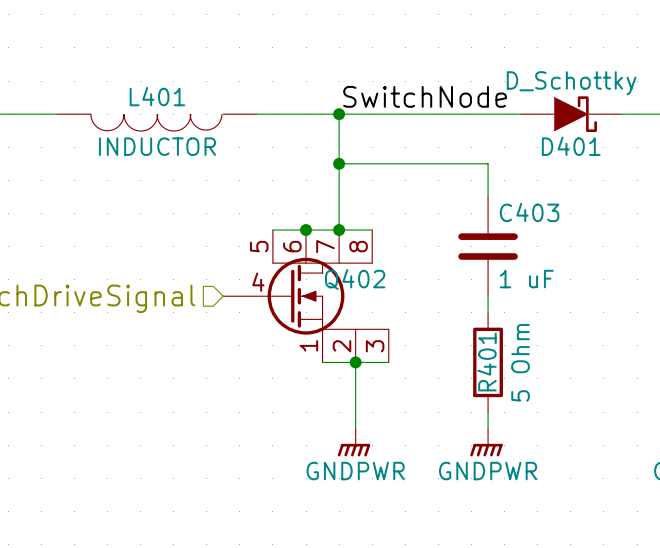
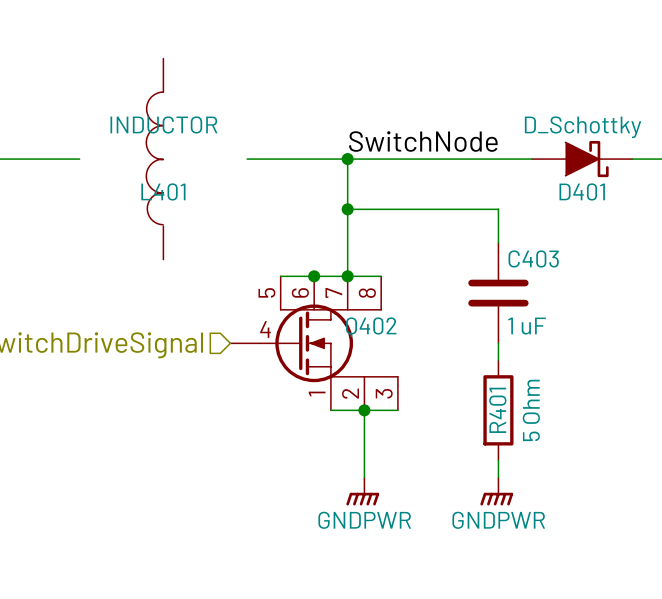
L401 name position: L401 (157, 96) -> L401 (163, 191)
L401 rotation: 0° (156, 122) -> 90° clockwise (154, 158)
L401 value position: INDUCTOR (157, 146) -> INDUCTOR (163, 124)

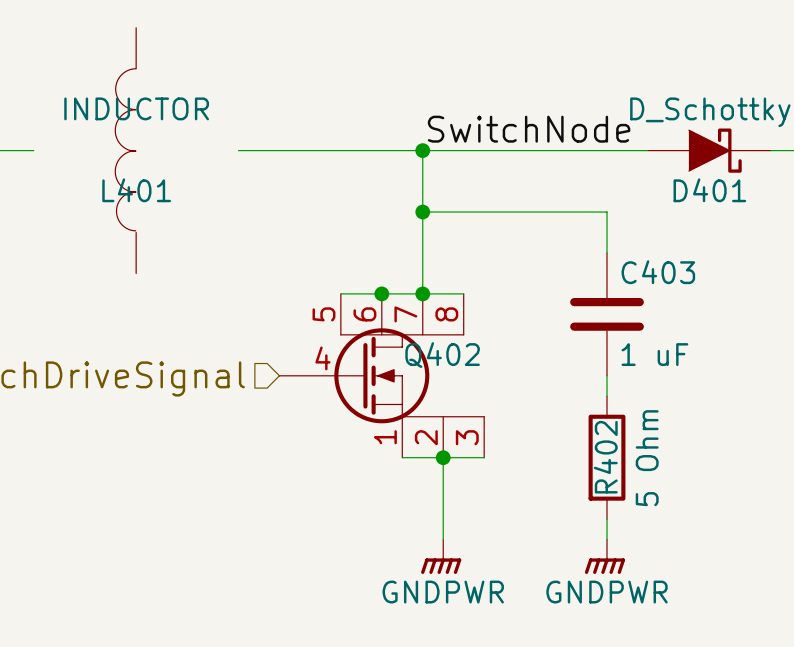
wire: (29, 159) (79, 159) -> (238, 150) (299, 150)
L401 position: (154, 159) -> (125, 150)
R401 name: R401 (497, 410) -> R402 (605, 457)

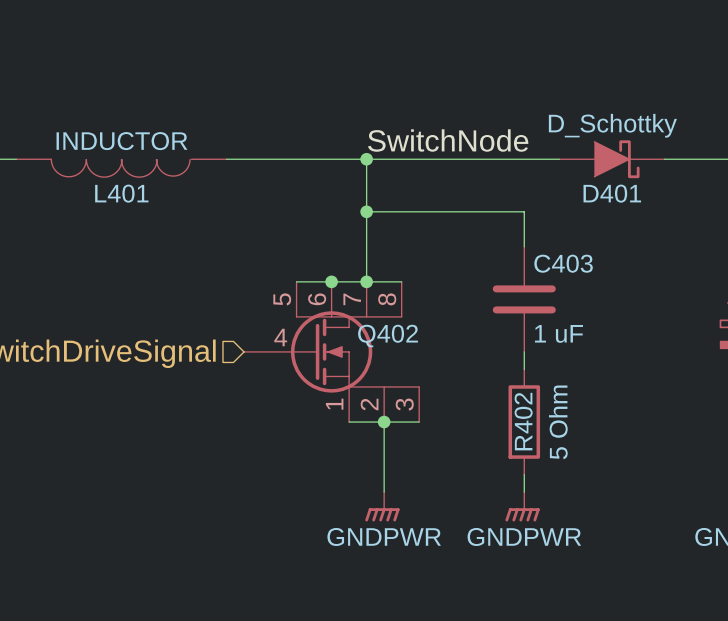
L401 rotation: 0° (125, 149) -> 90° counterclockwise (120, 168)

